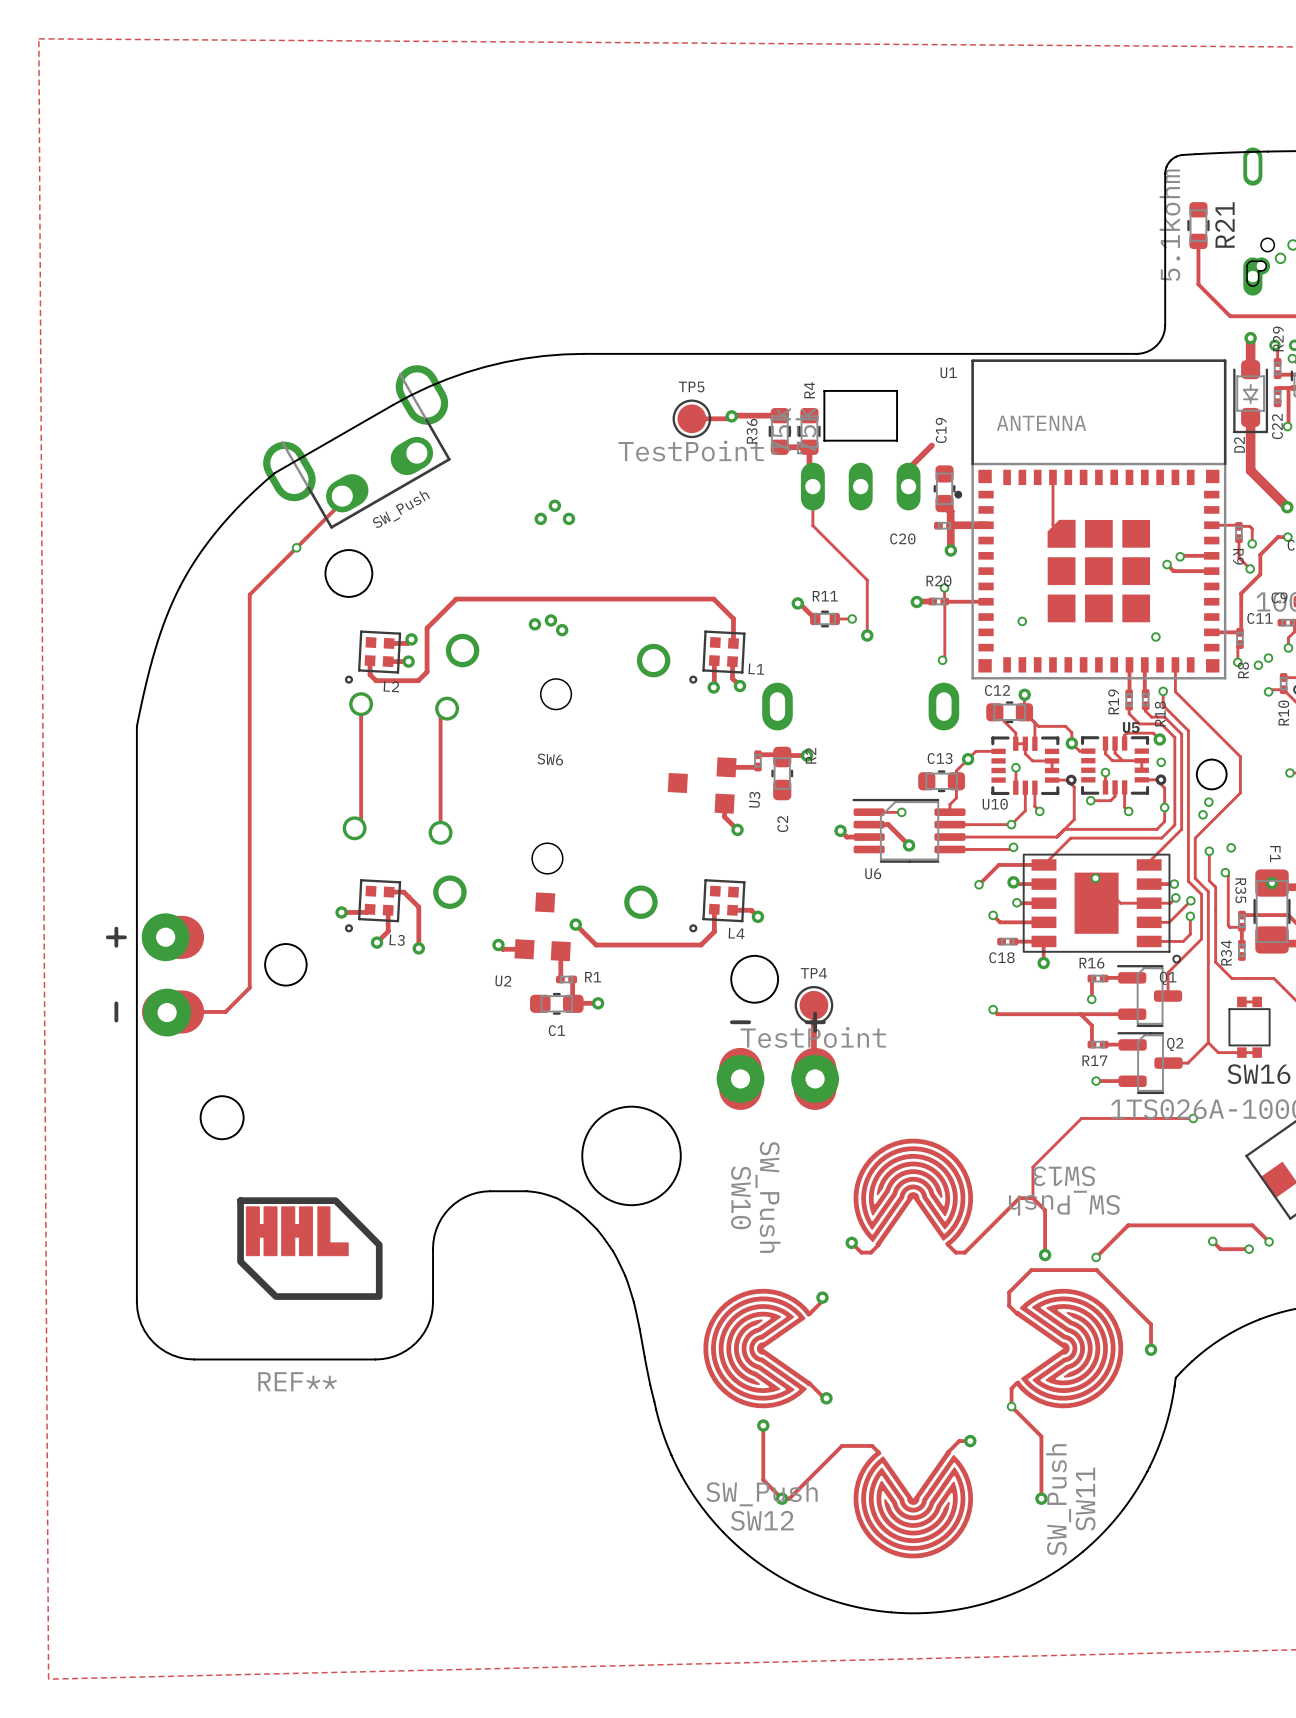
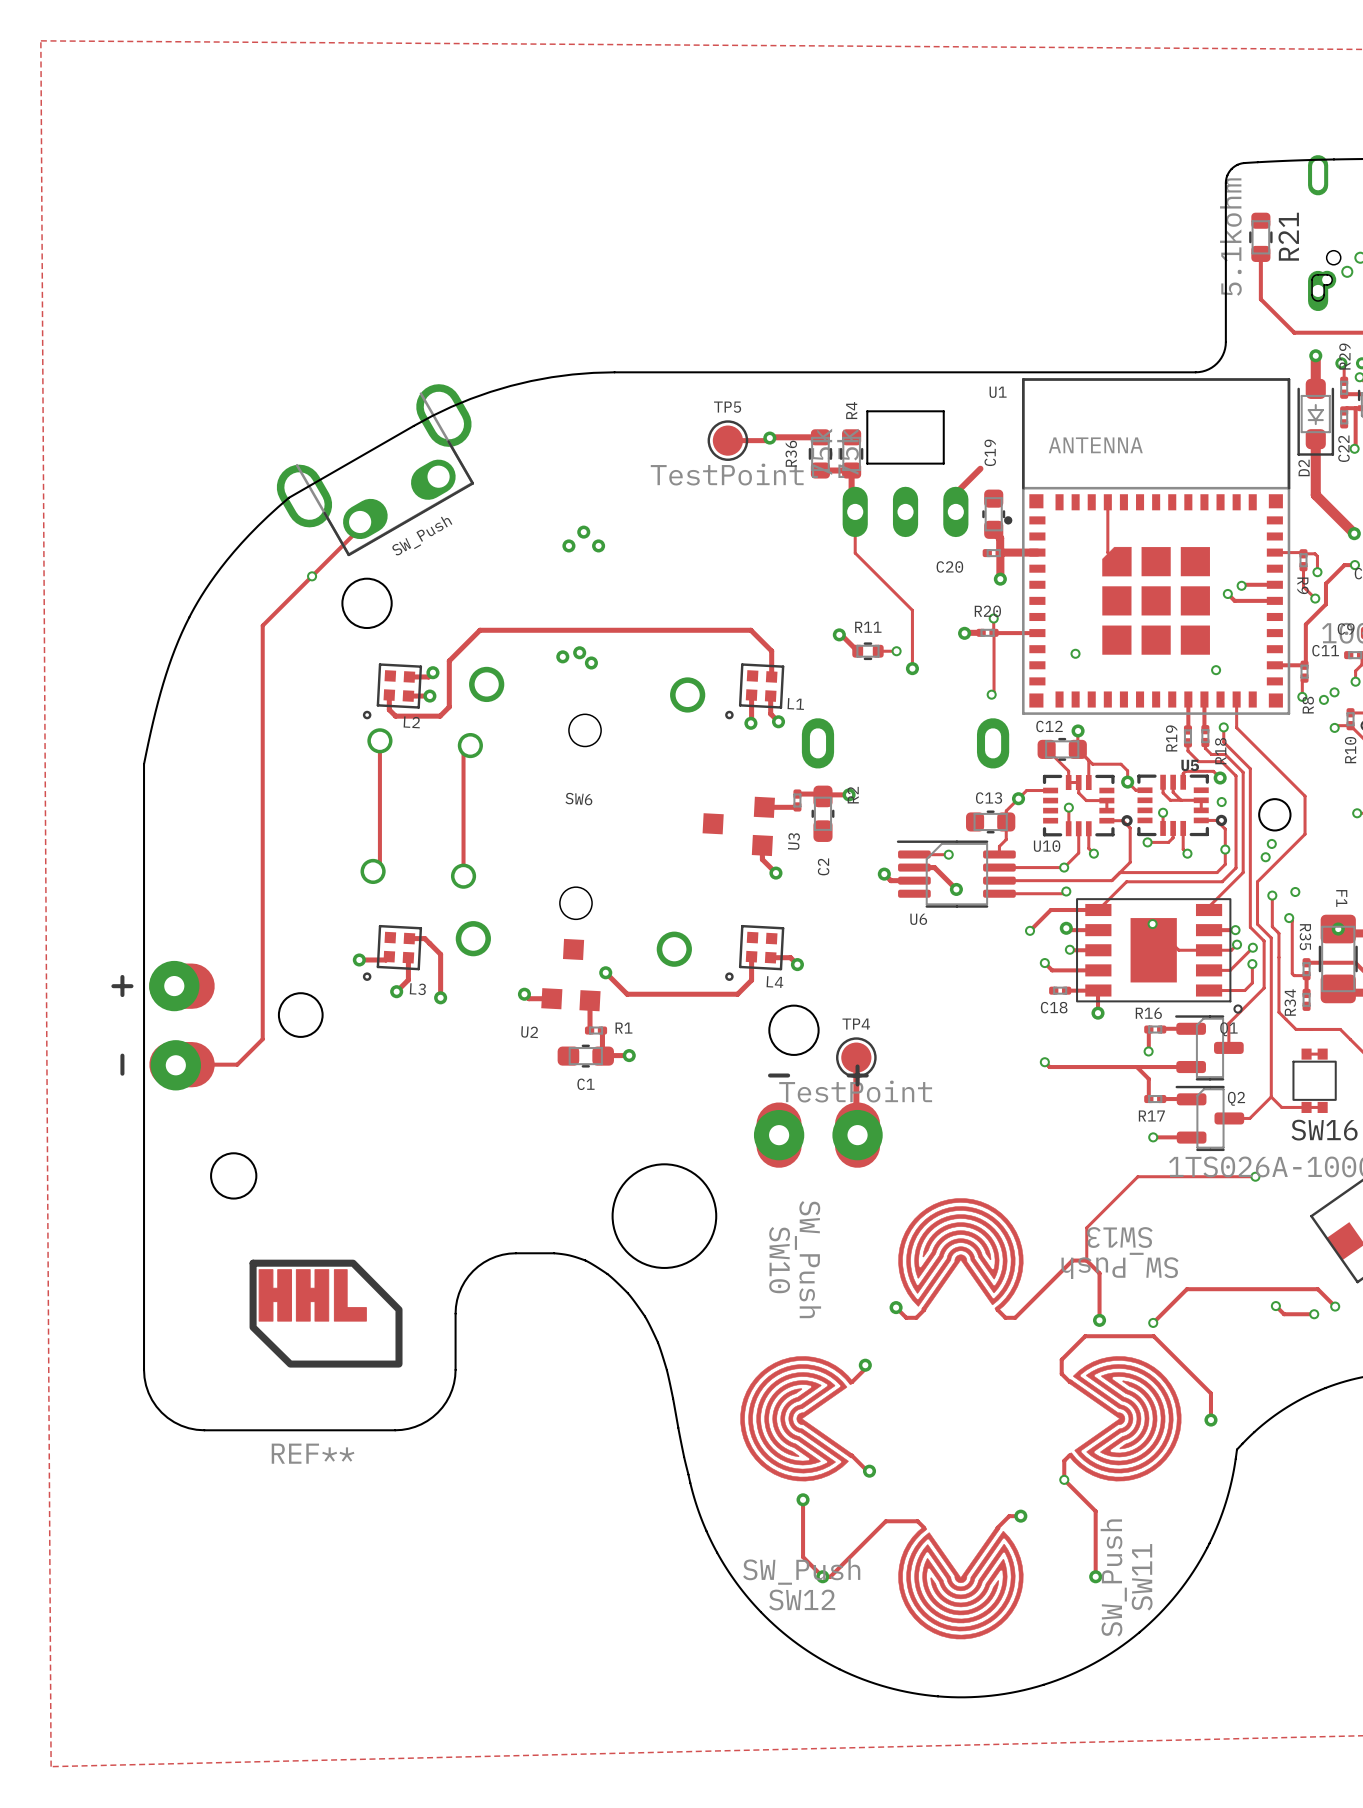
SW10 footprint: [853, 1138, 974, 1247] -> [898, 1198, 1024, 1312]
SW12 footprint: [703, 1288, 812, 1409] -> [740, 1356, 854, 1482]
SW13 footprint: [1014, 1288, 1124, 1409] -> [1067, 1356, 1182, 1482]
SW11 footprint: [853, 1450, 974, 1559] -> [898, 1525, 1024, 1640]

